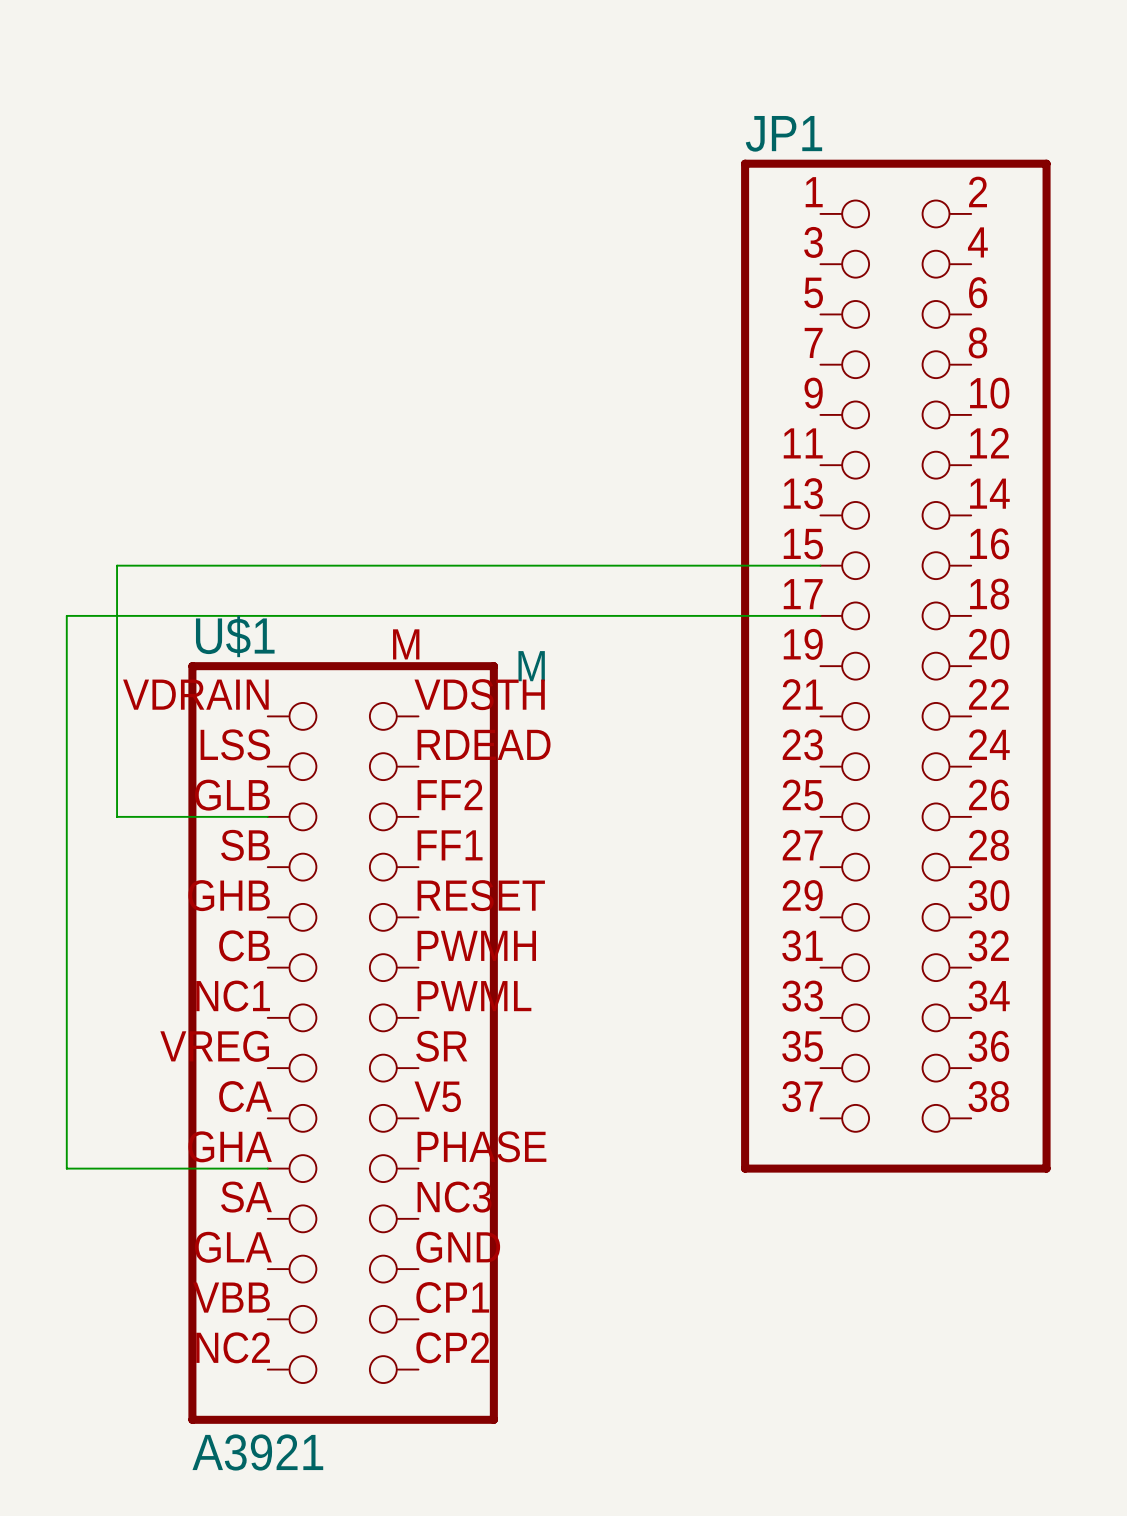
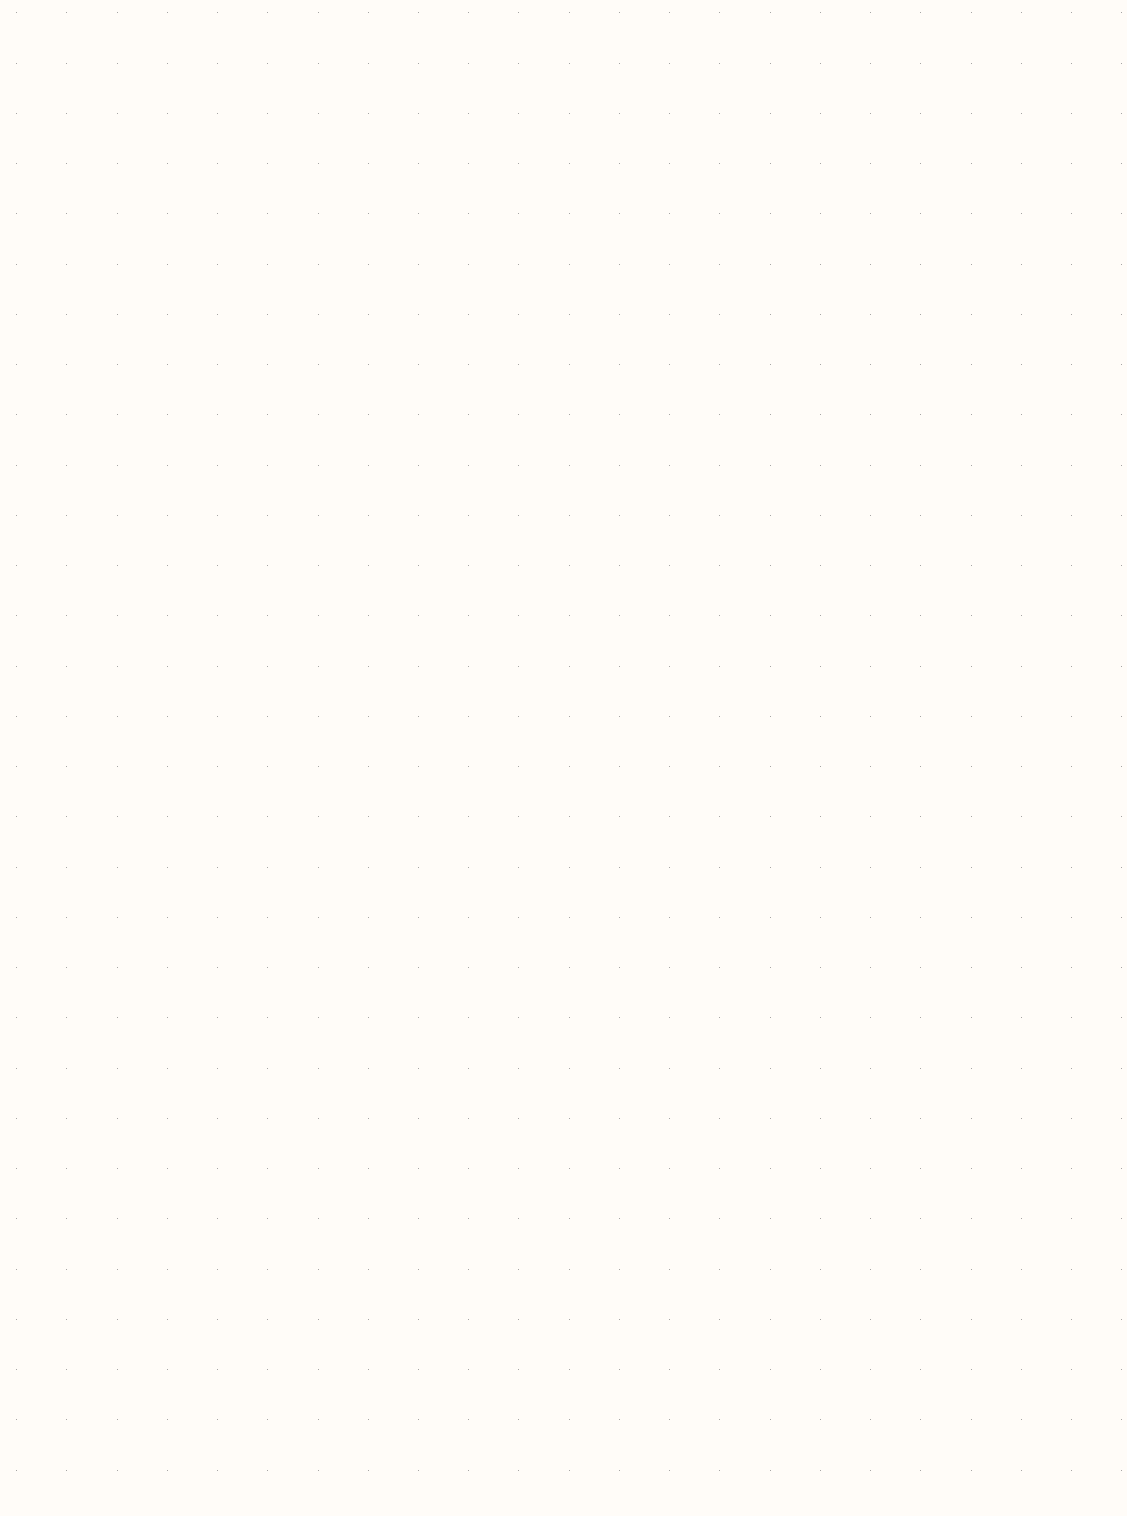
wire: (820, 565) (117, 565) (117, 816) (267, 816) -> none
wire: (820, 615) (66, 615) (66, 1168) (267, 1168) -> none
JP1: (895, 666) -> none
U$1: A3921 (343, 1042) -> none

